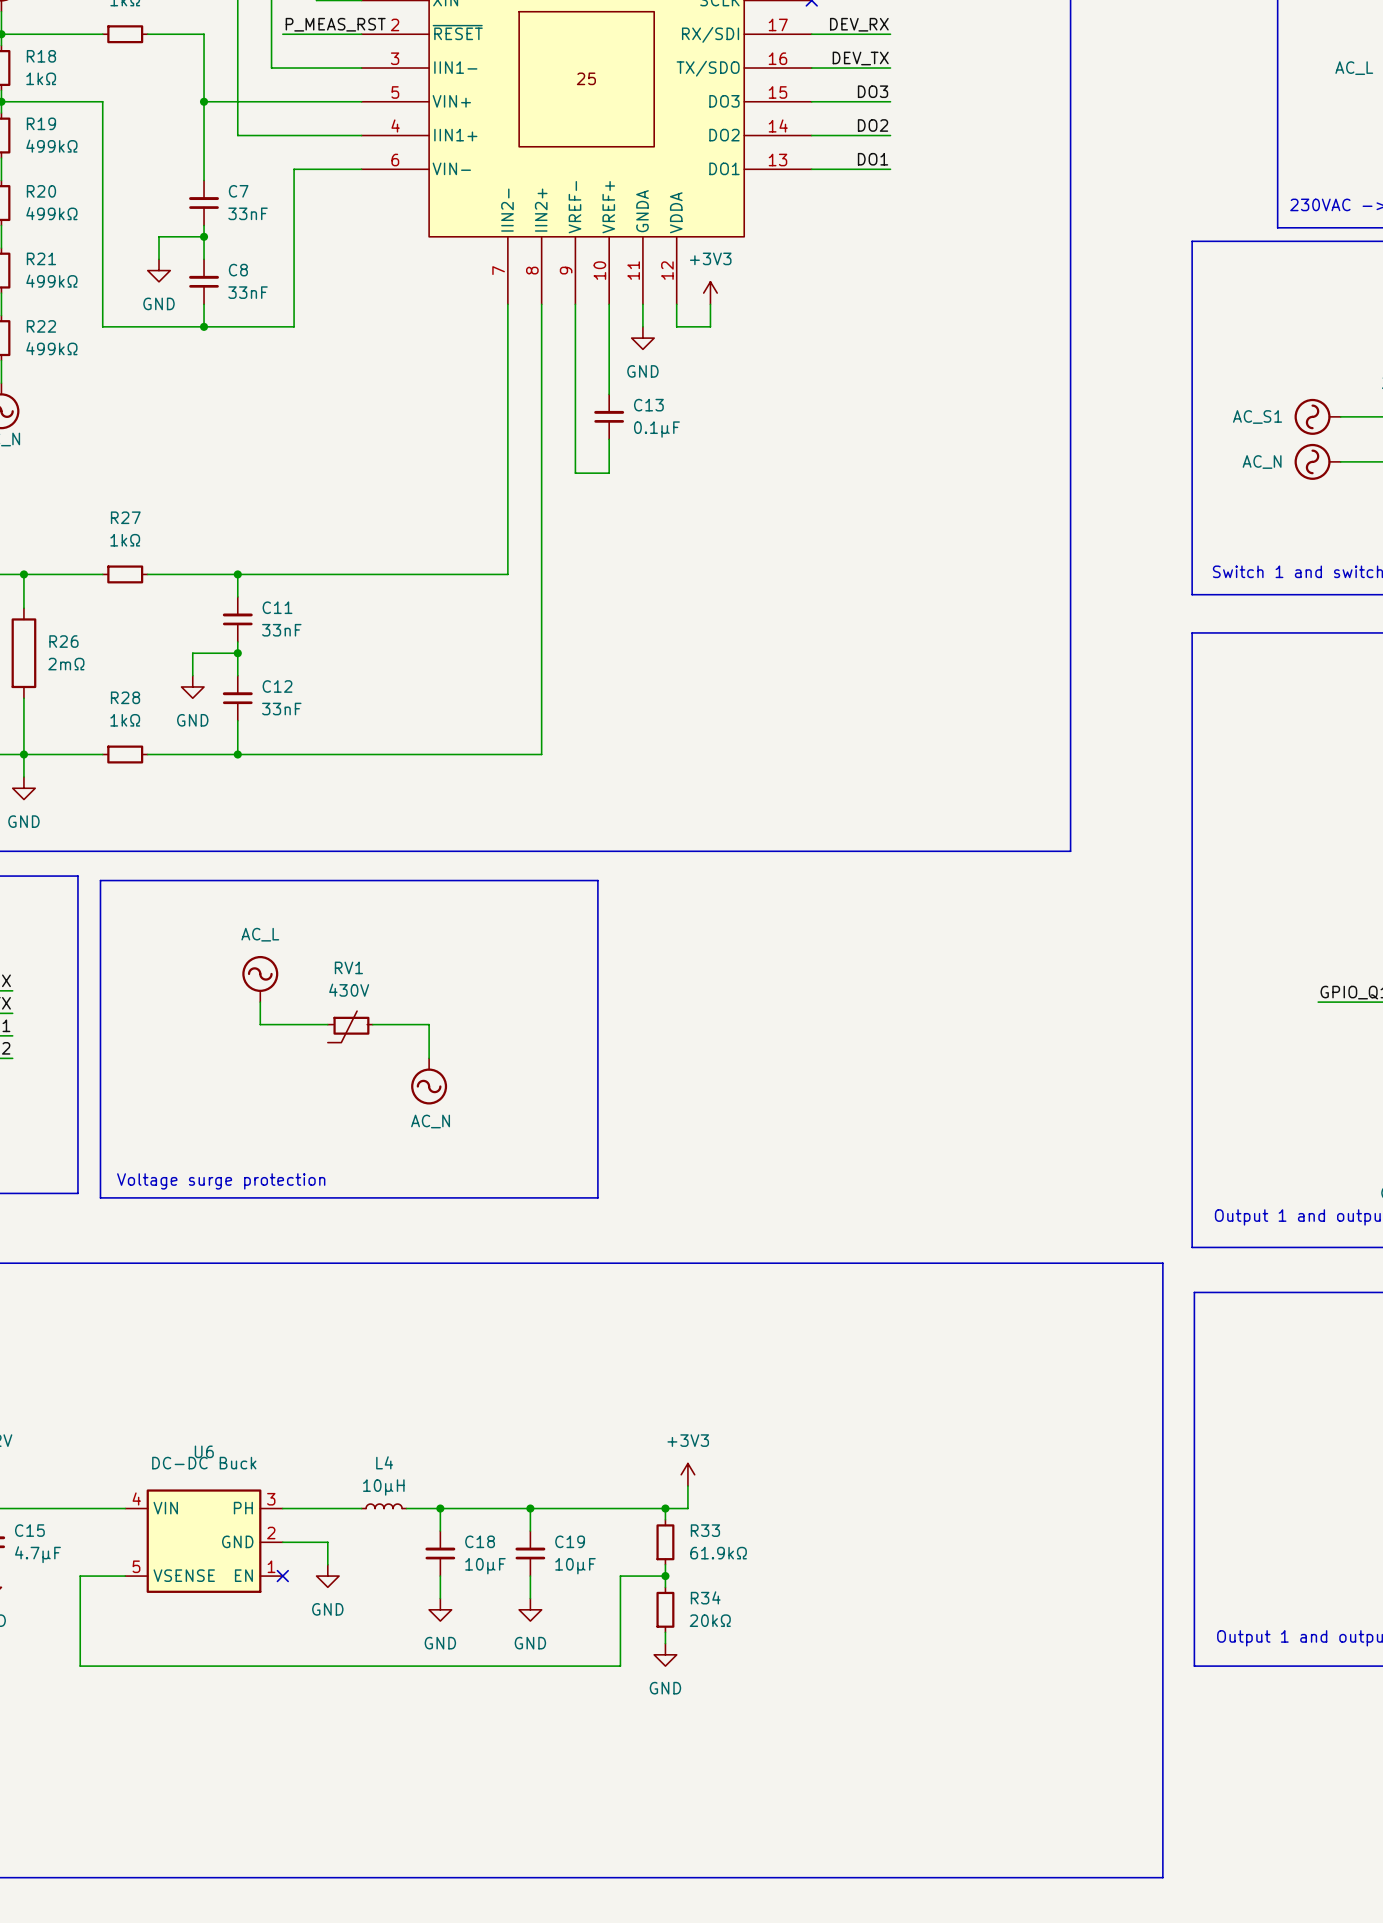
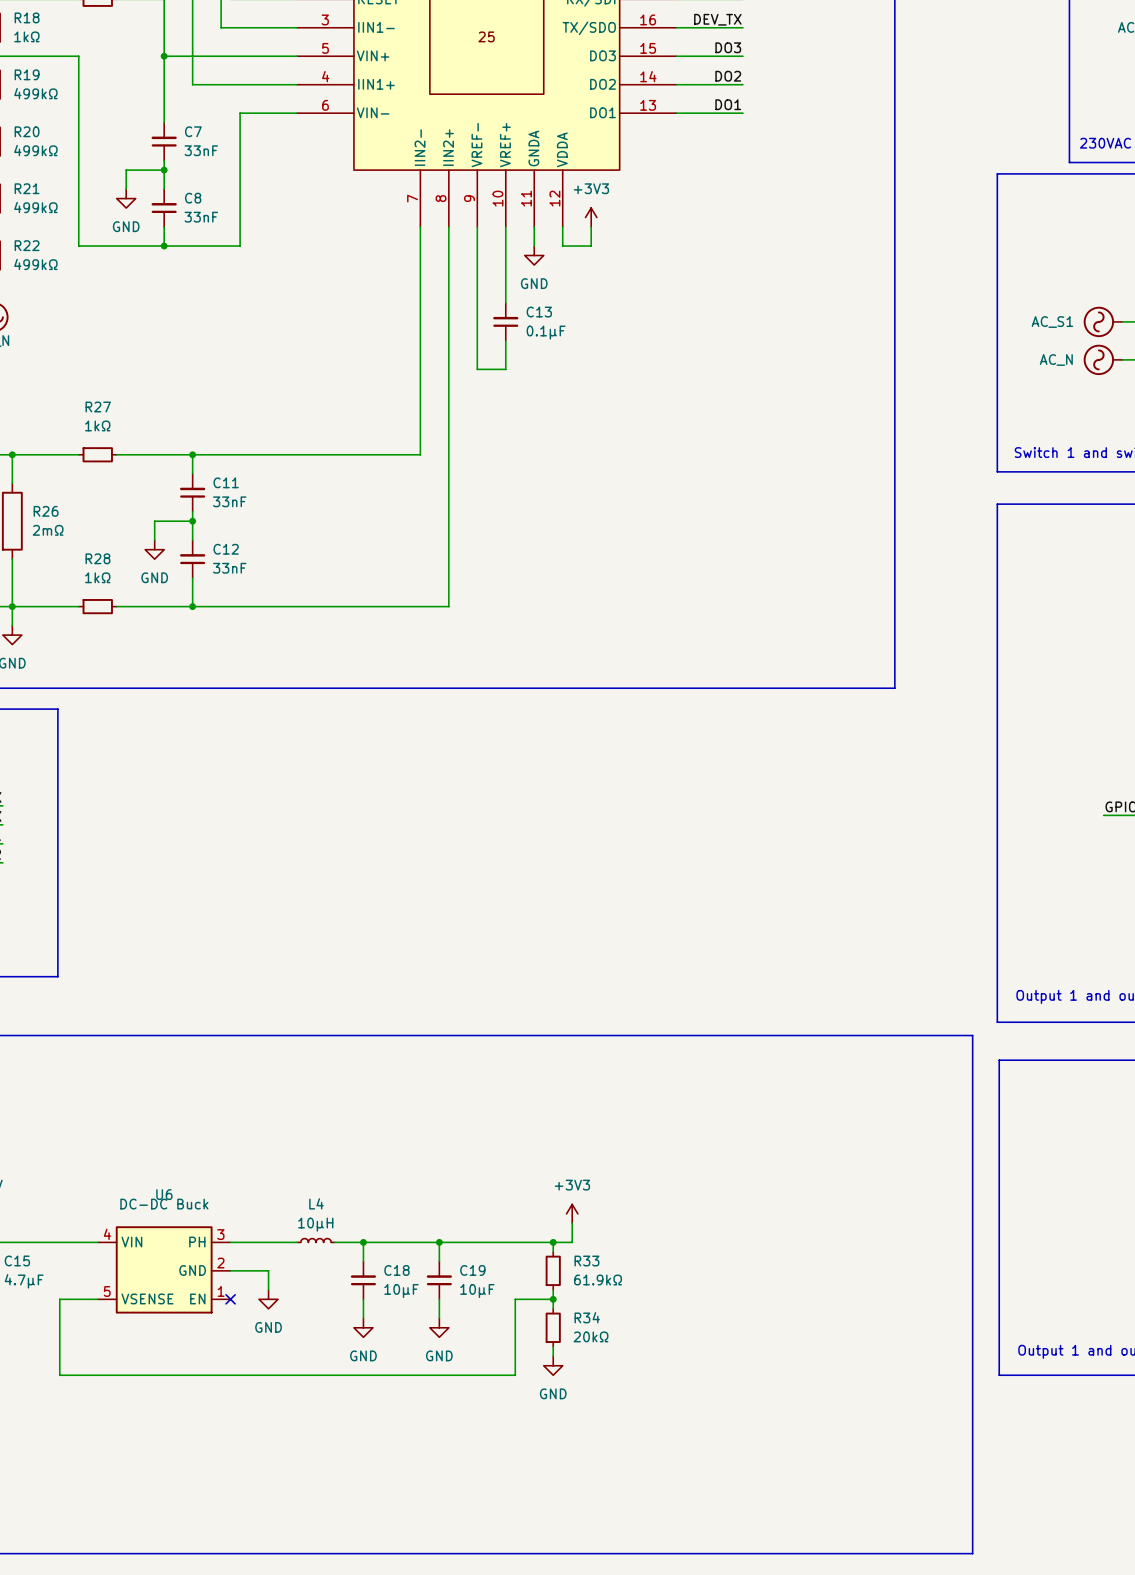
line: (100, 880) (597, 880) (597, 1197) (100, 1197) (100, 880) -> none
power symbol: AC_L (260, 979) -> none
wire: (260, 1002) (260, 1024) (327, 1024) -> none
wire: (372, 1024) (429, 1024) (429, 1058) -> none
RV1: (350, 1026) -> none
power symbol: AC_N (429, 1081) -> none
text: Voltage surge protection (221, 1181) -> none

